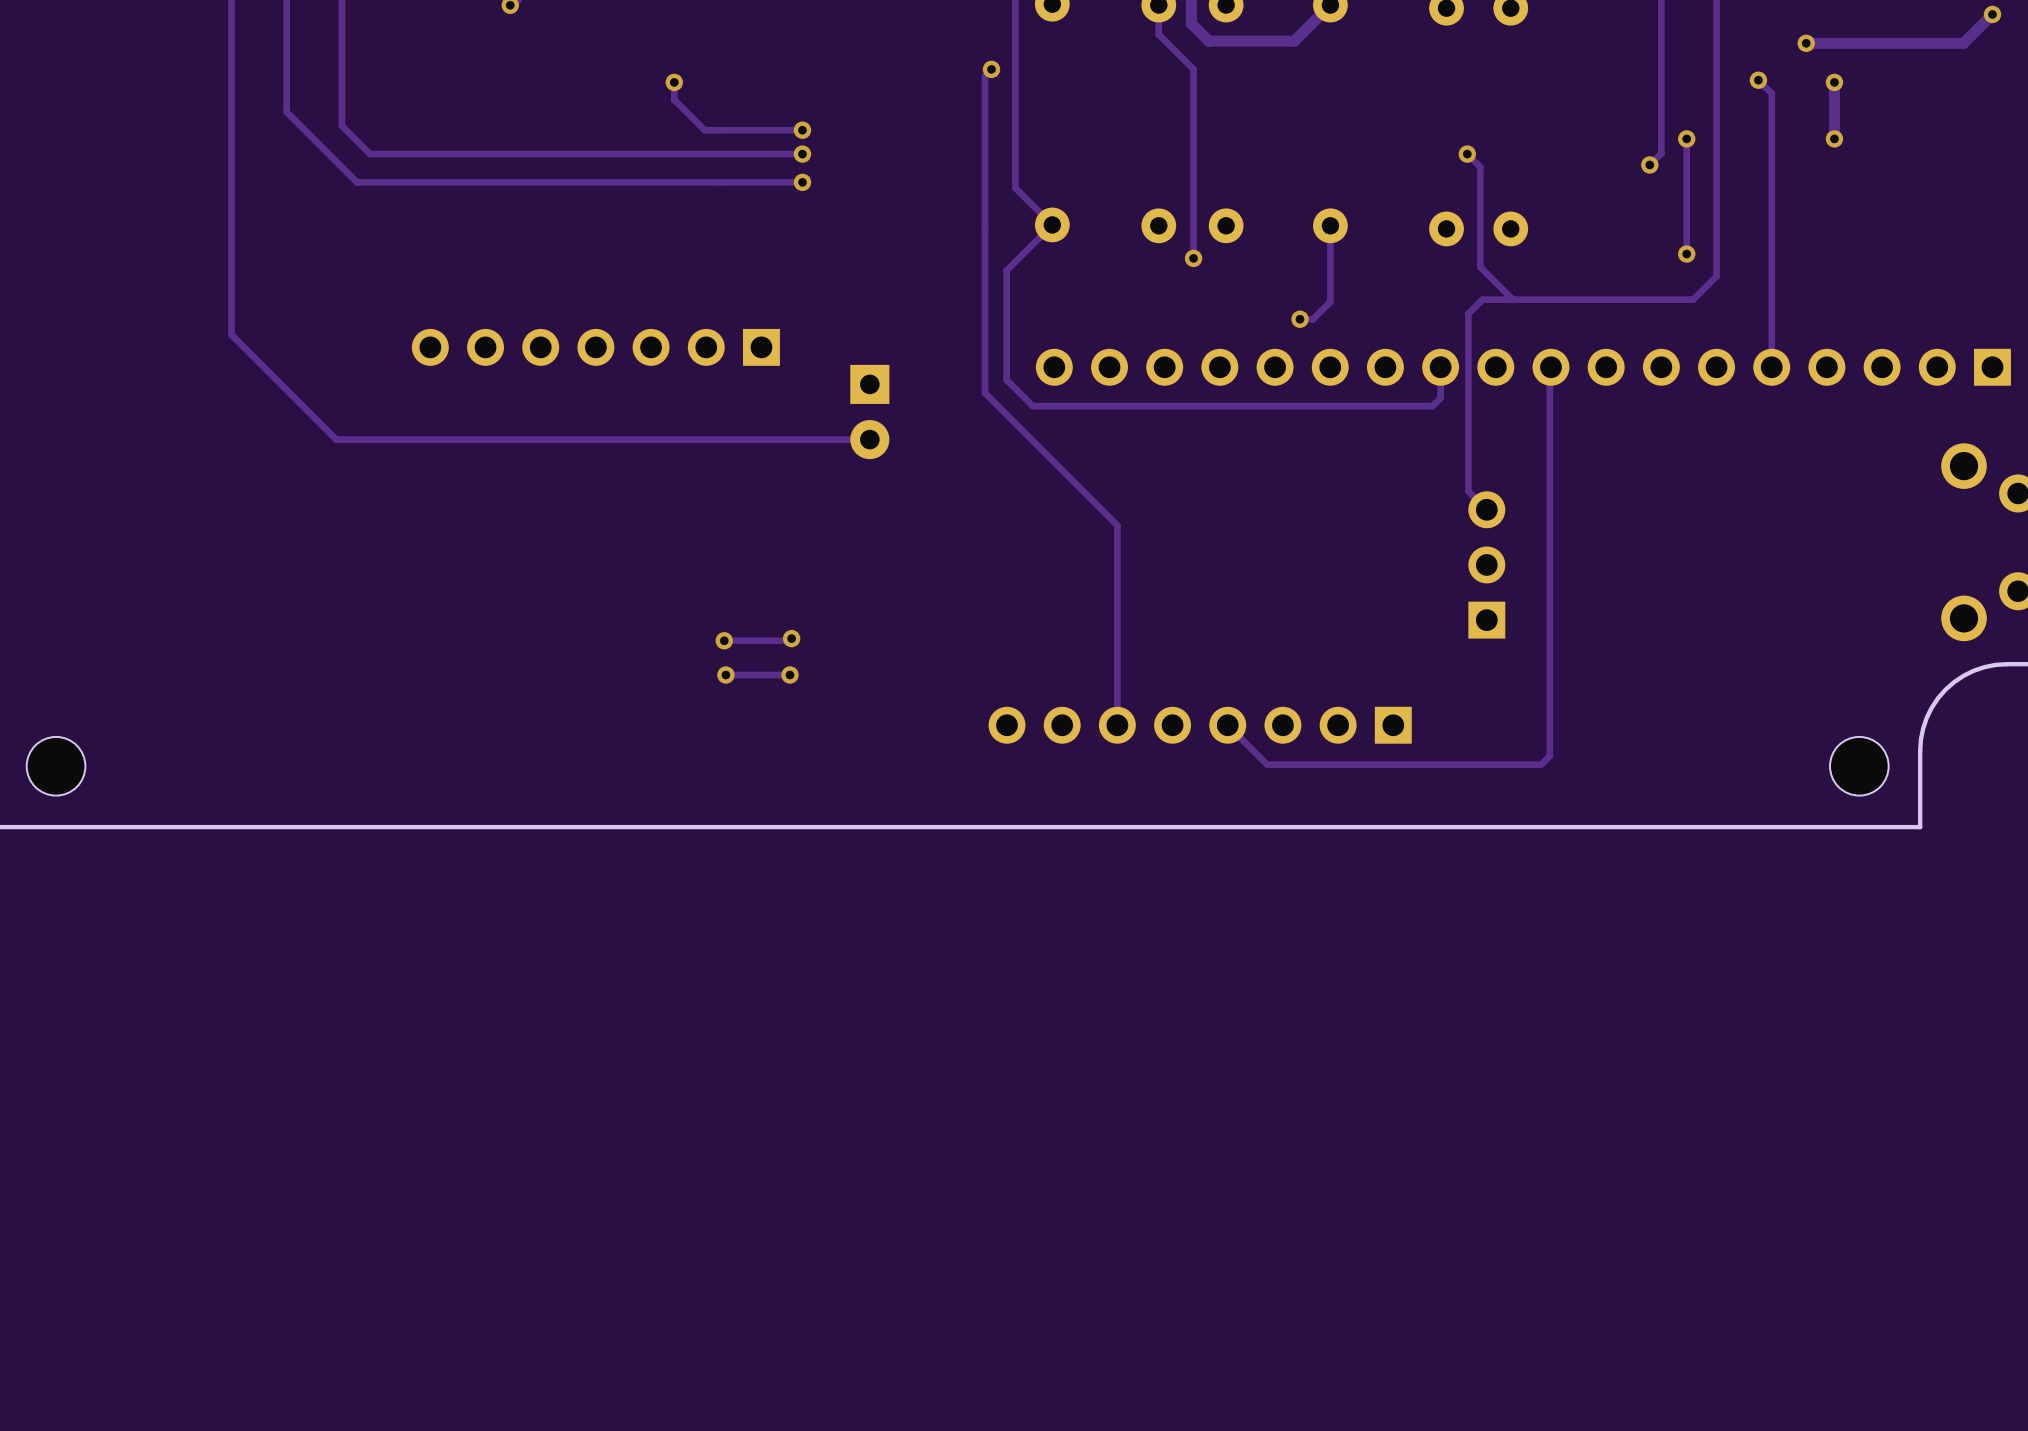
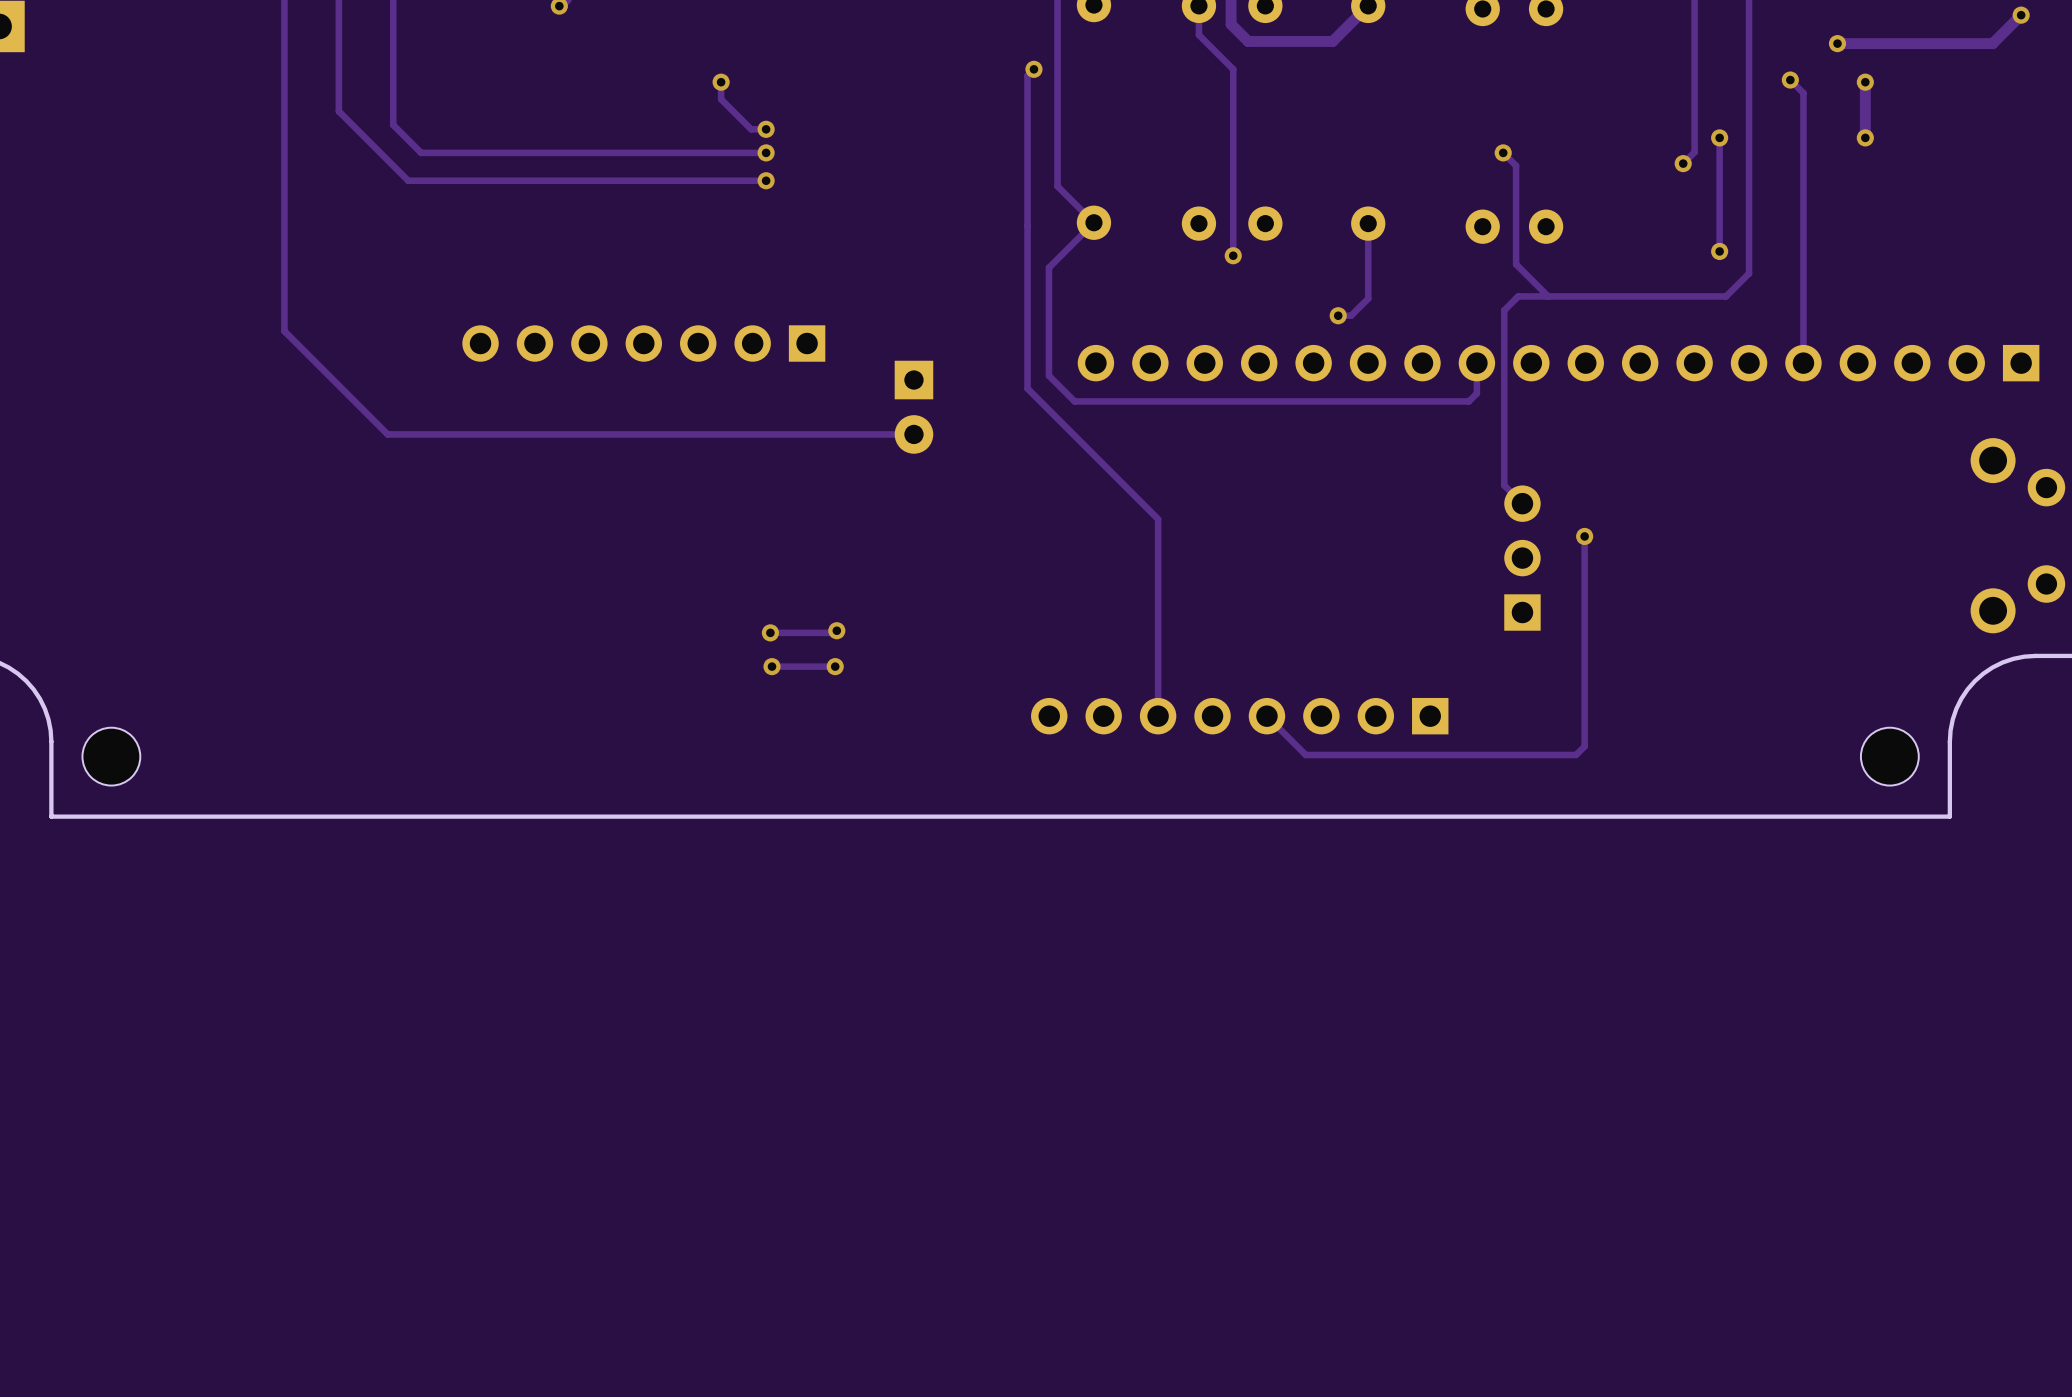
via: none -> (766, 129)
track: (802, 130) (719, 130) -> none
via: (802, 130) -> none
via: none -> (766, 152)
track: (802, 154) (719, 154) -> none
via: (802, 154) -> none
via: none -> (766, 180)
track: (802, 182) (719, 182) -> none
via: (802, 182) -> none
track: (1550, 367) (1549, 543) -> none
via: none -> (1584, 536)

